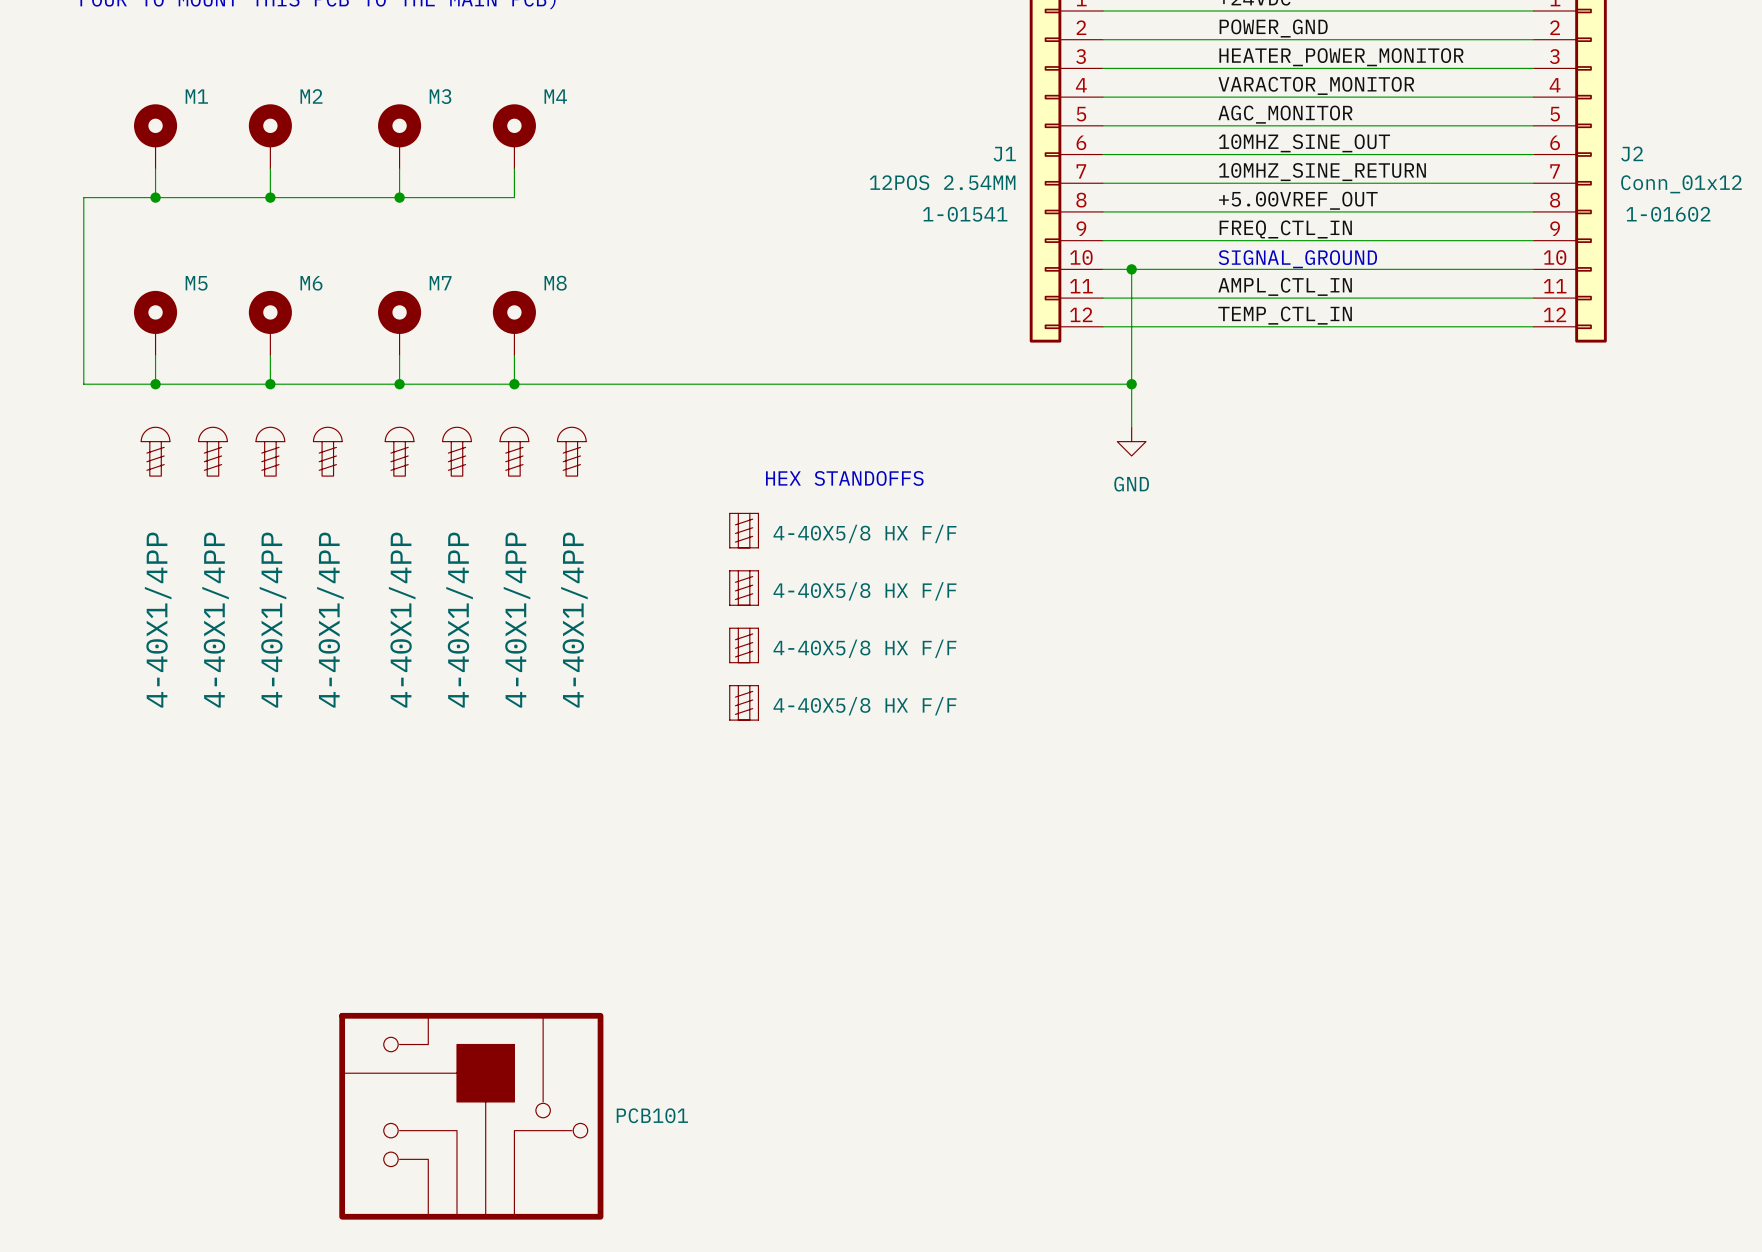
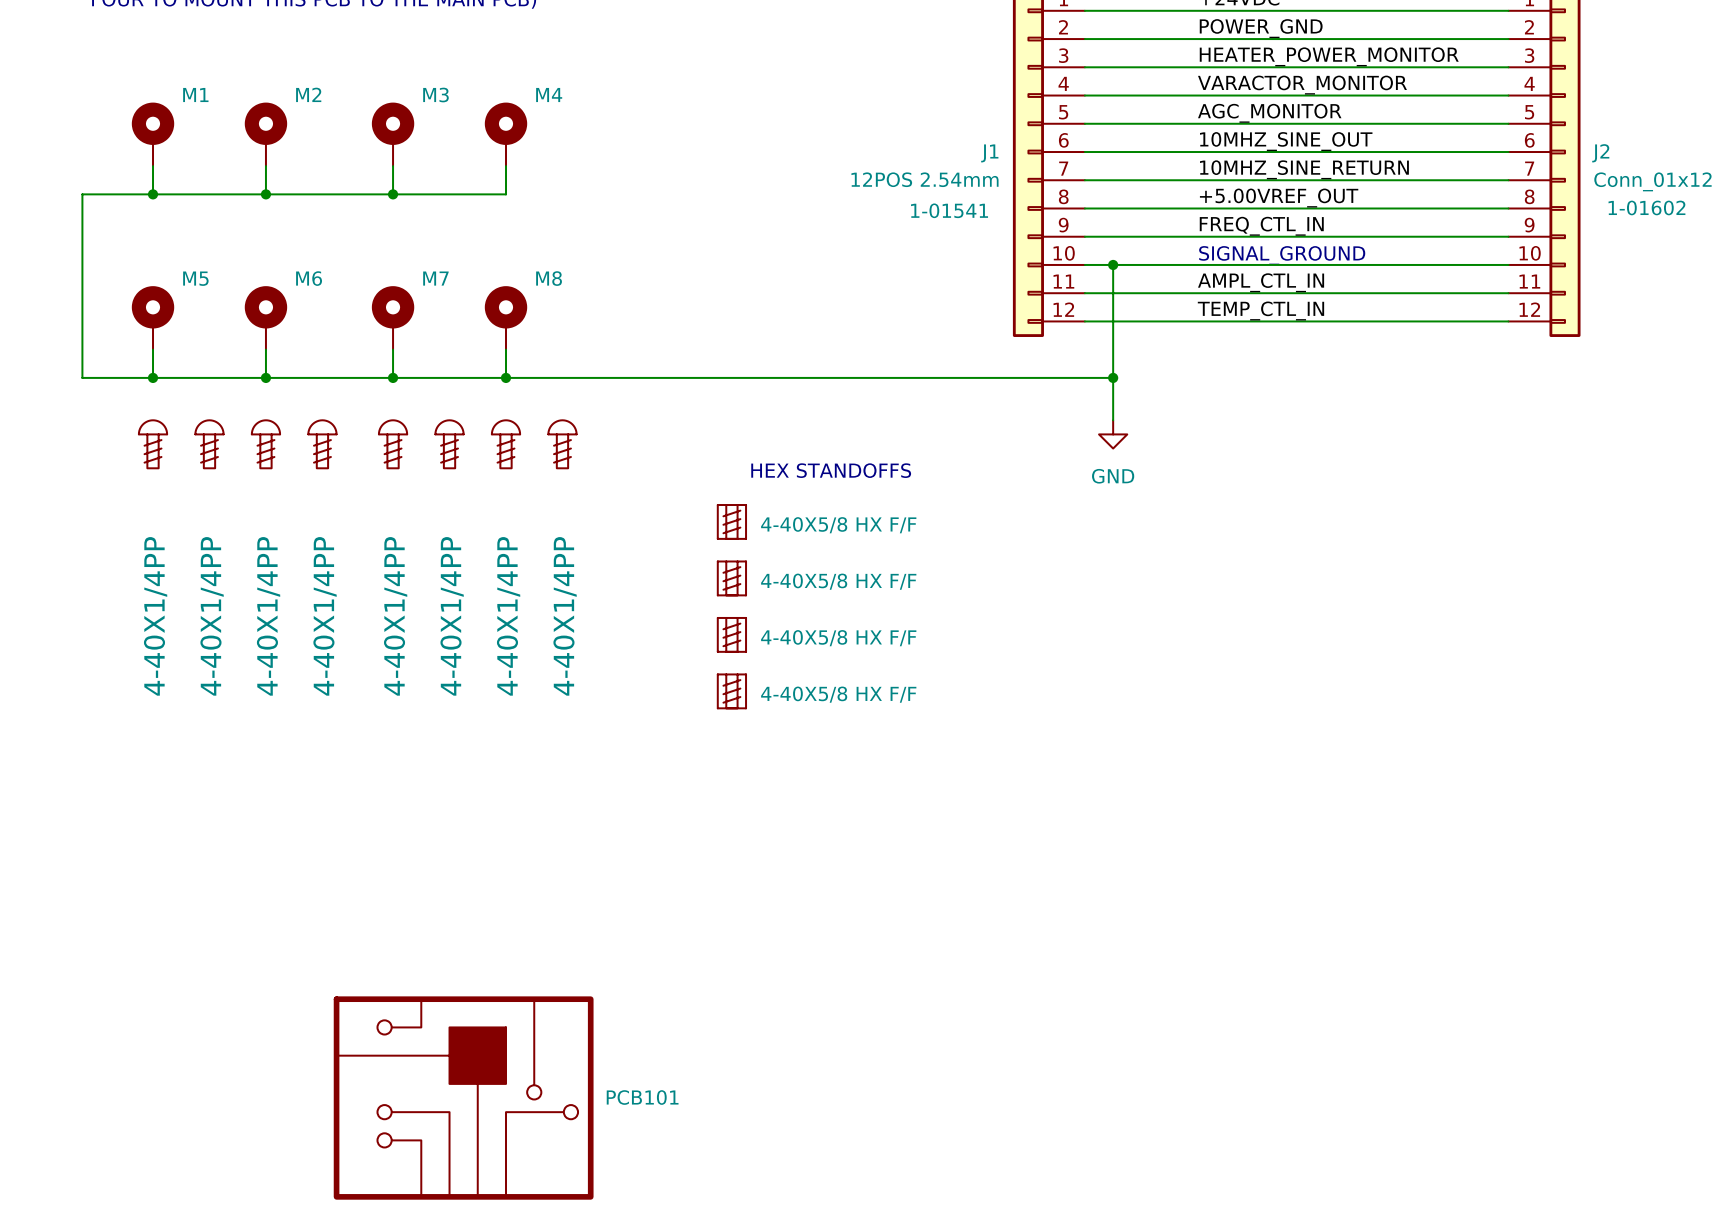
J1 value: 12POS 2.54MM (942, 182) -> 12POS 2.54mm (925, 179)
J2 text: none -> 1-01602 (1646, 207)
J2 text: 1-01602 (1668, 214) -> none

